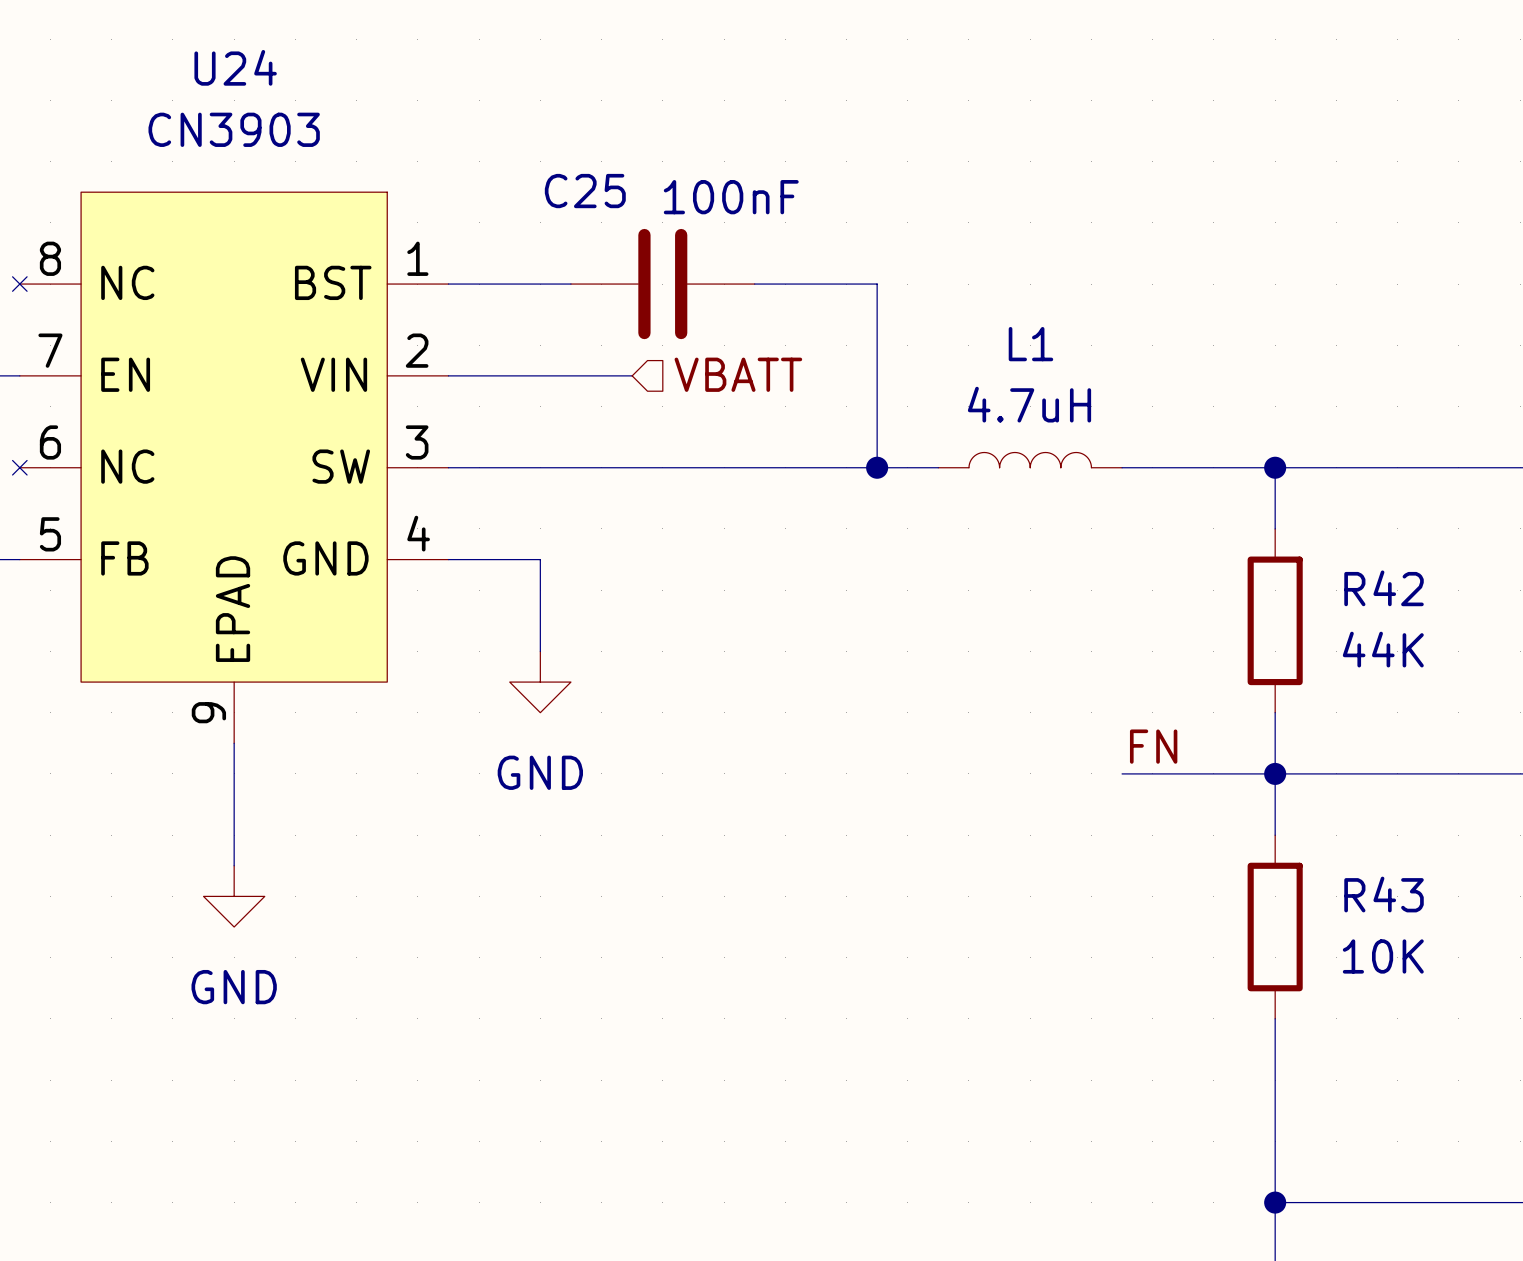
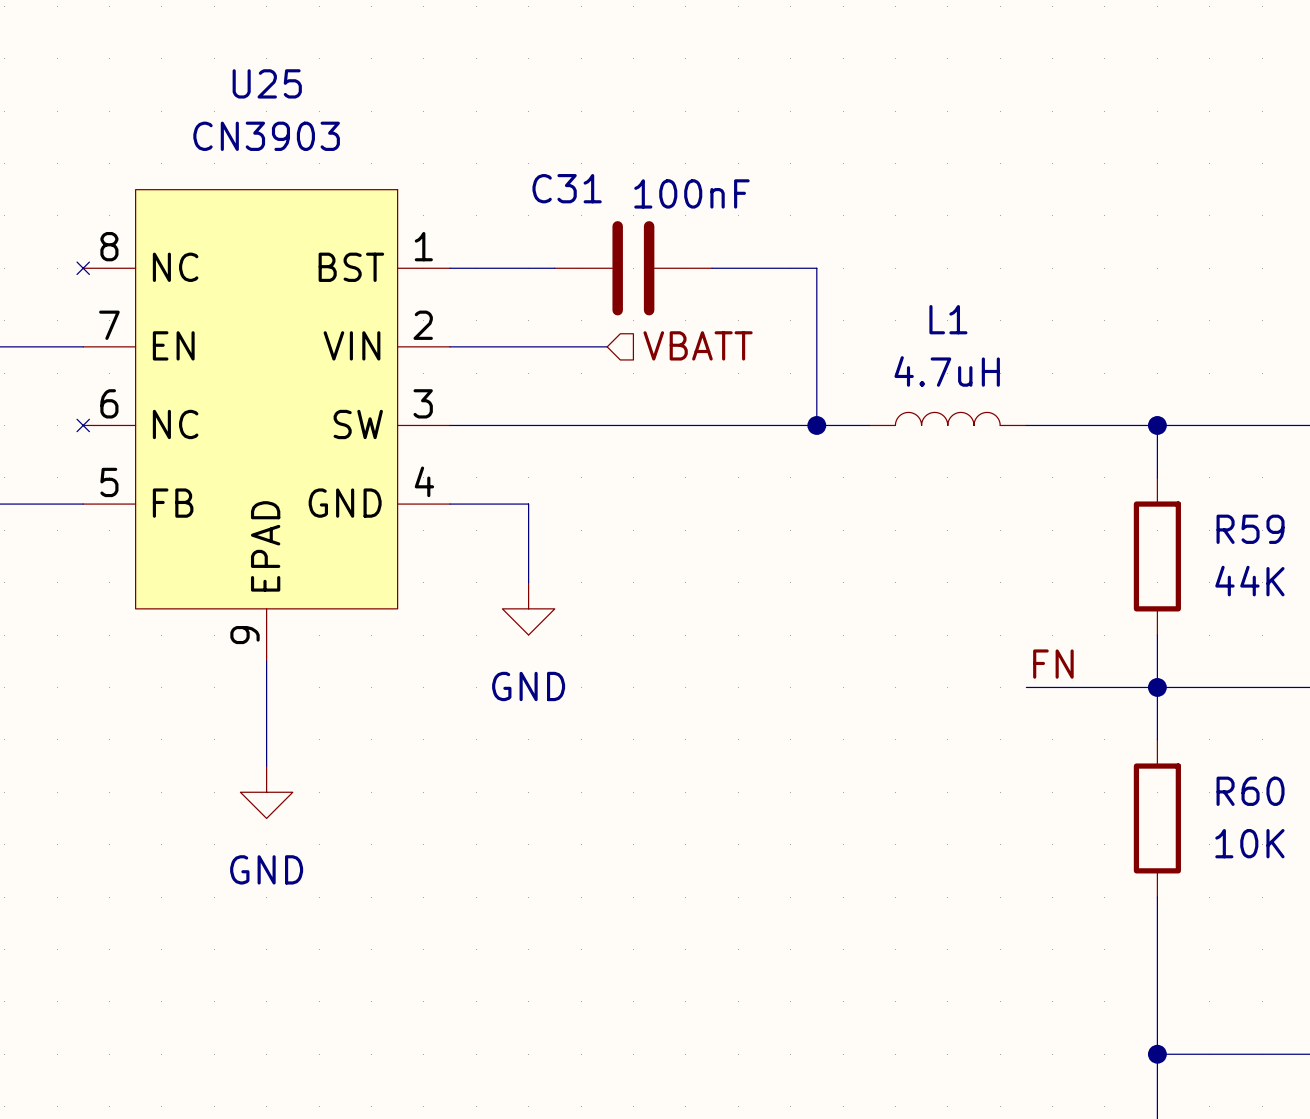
U24 name: U24 (235, 67) -> U25 (267, 83)
C25 name: C25 (585, 191) -> C31 (567, 188)
R42 name: R42 (1384, 588) -> R59 (1250, 529)
R43 name: R43 (1384, 894) -> R60 (1250, 791)

